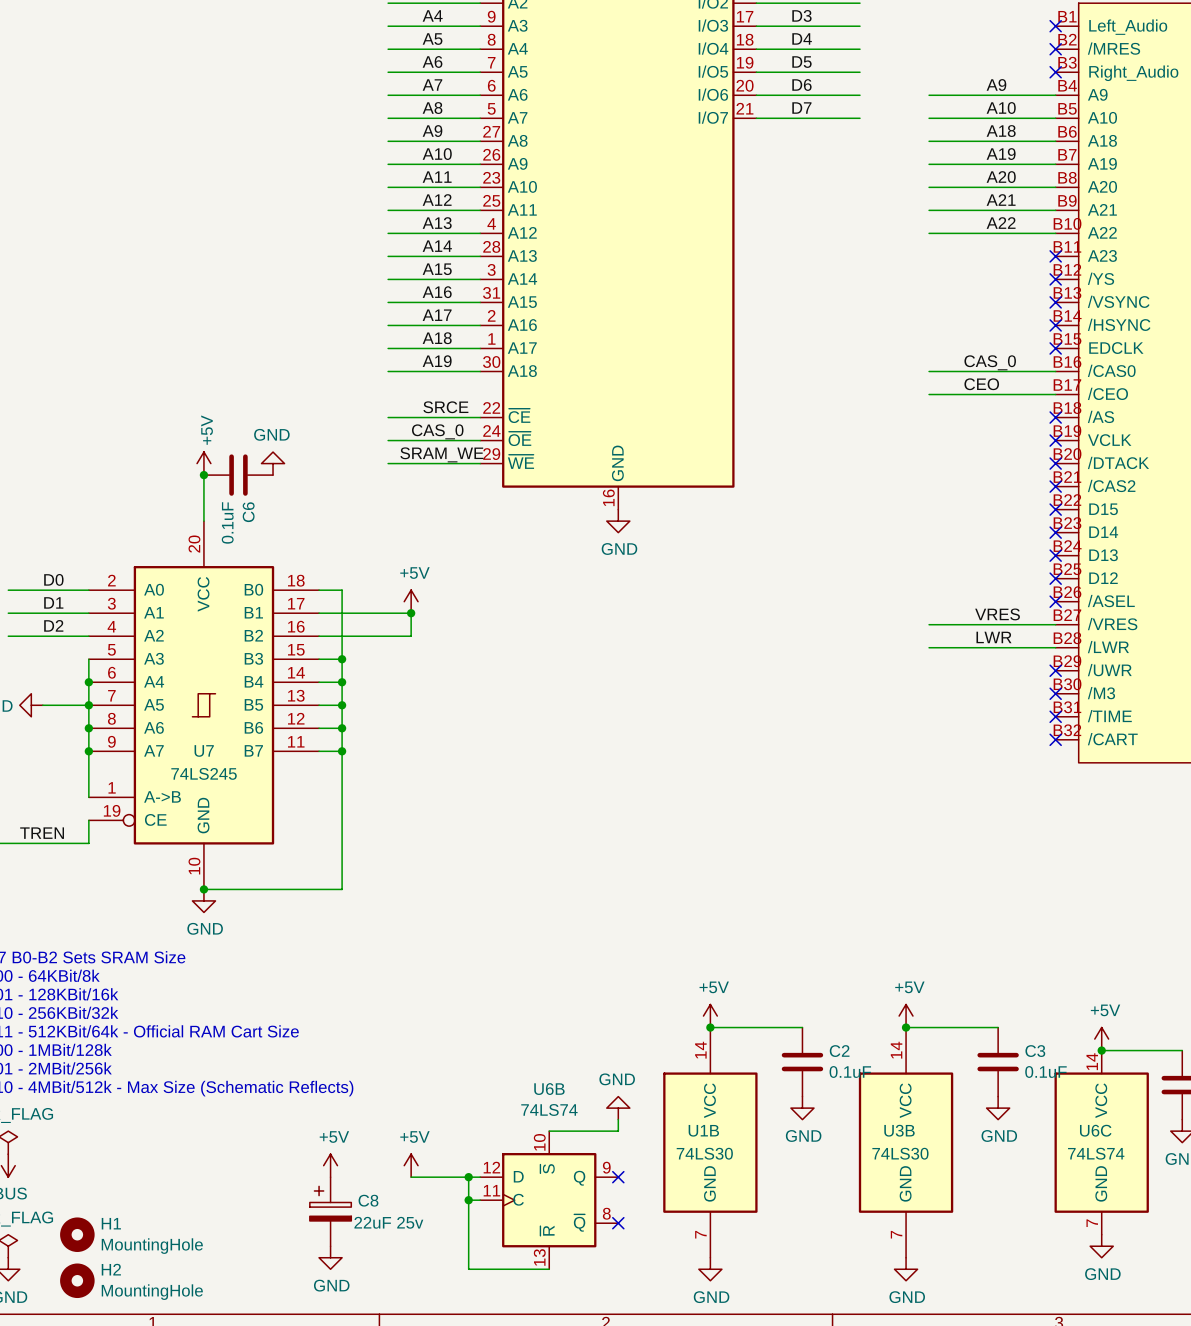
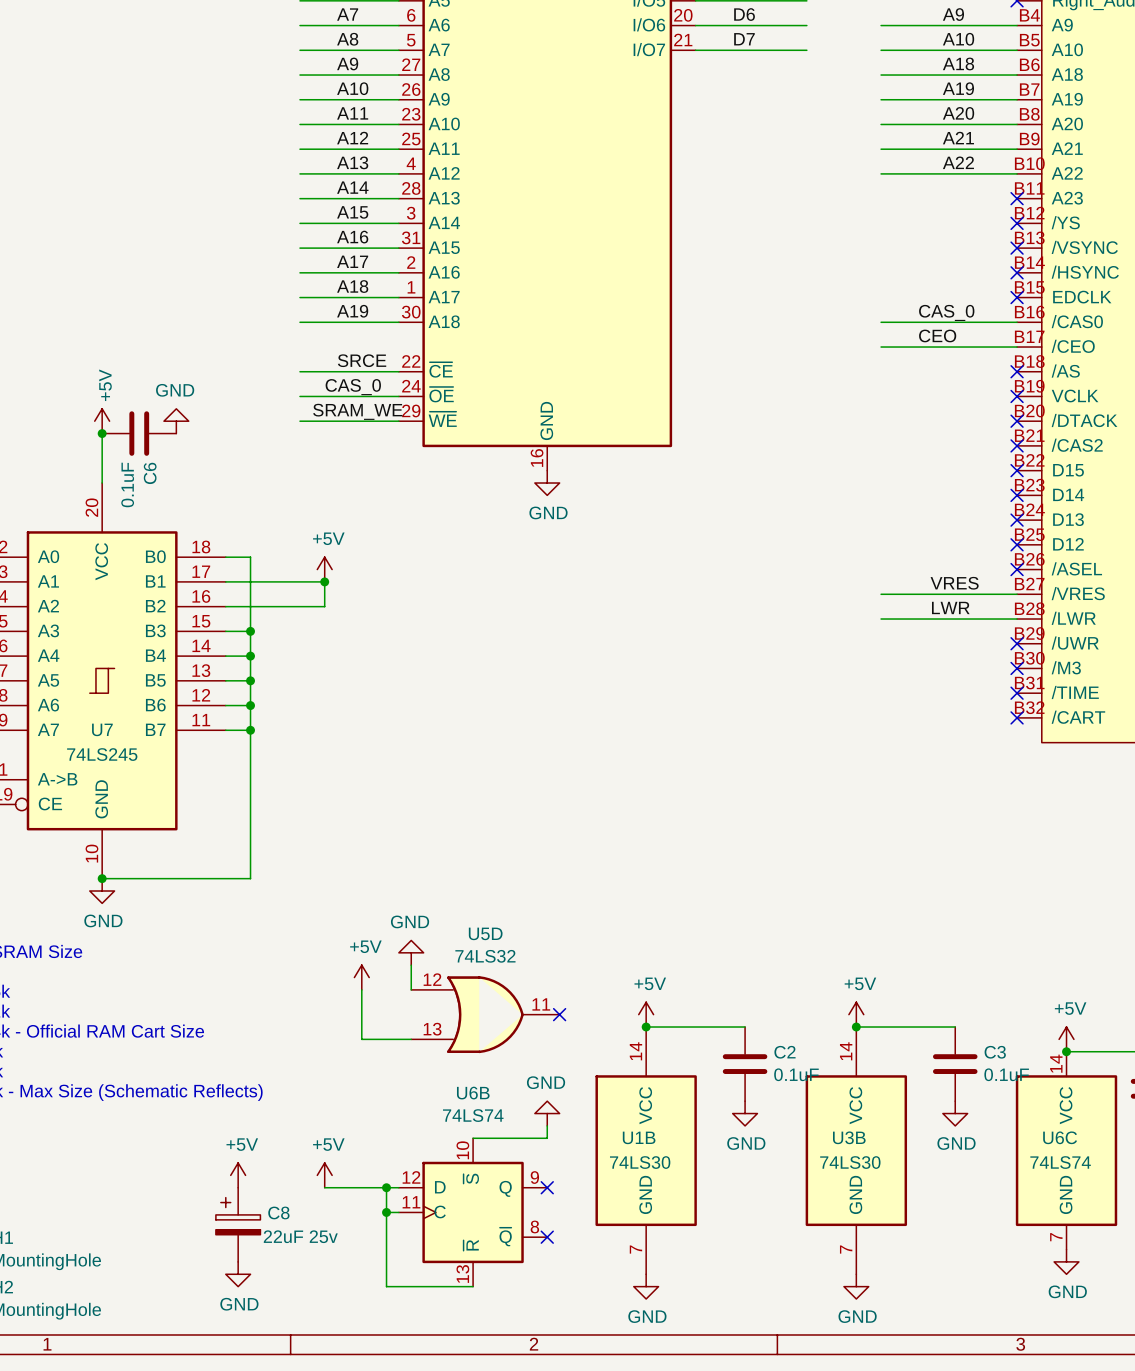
power symbol: none -> GND (411, 952)
wire: none -> (411, 965) (411, 989)
power symbol: none -> +5V (361, 977)
wire: none -> (361, 989) (361, 1039) (411, 1039)
U5D: none -> 74LS32 (485, 1014)
no-connect mark: none -> (559, 1014)

